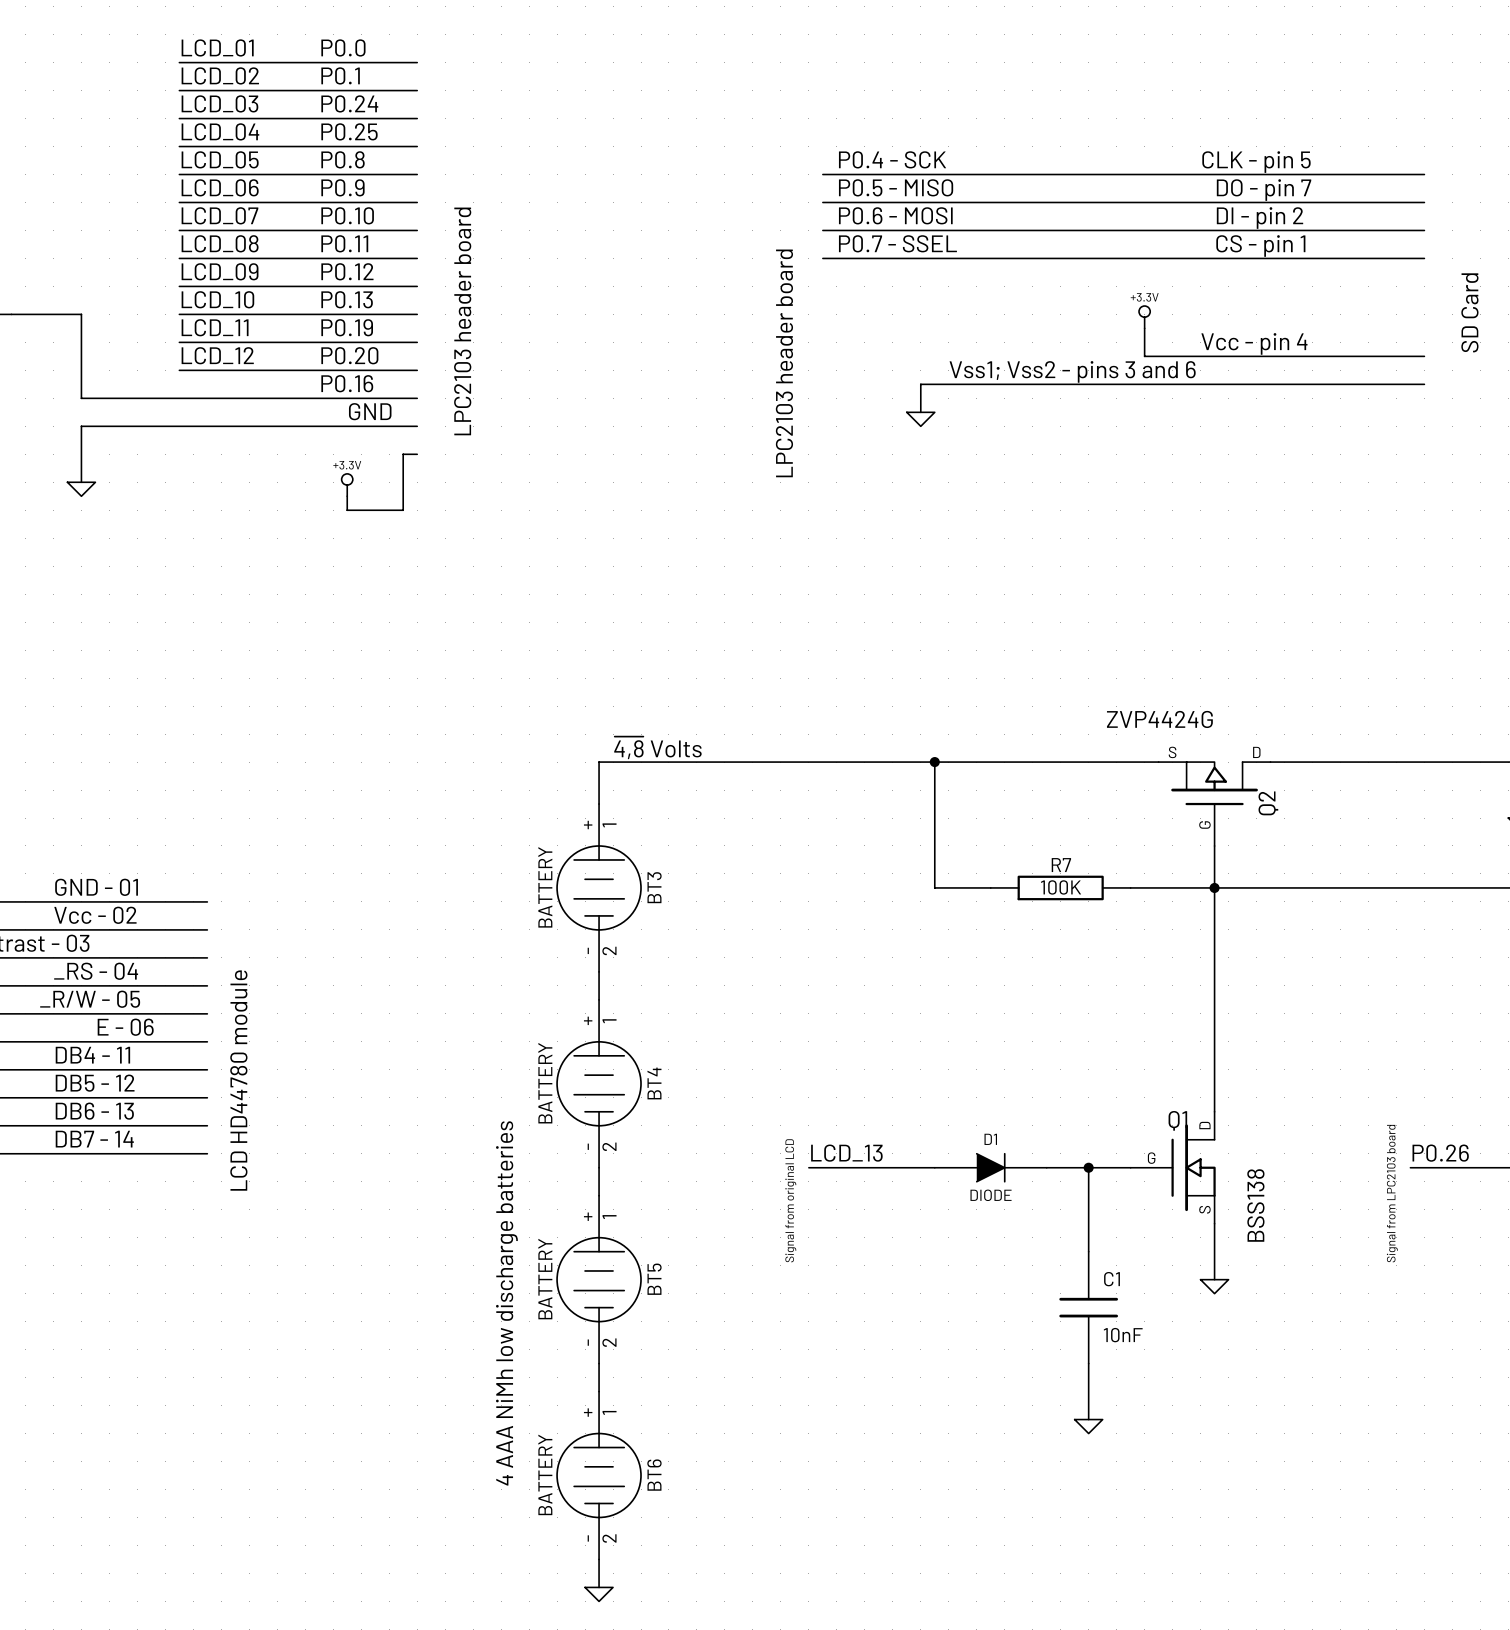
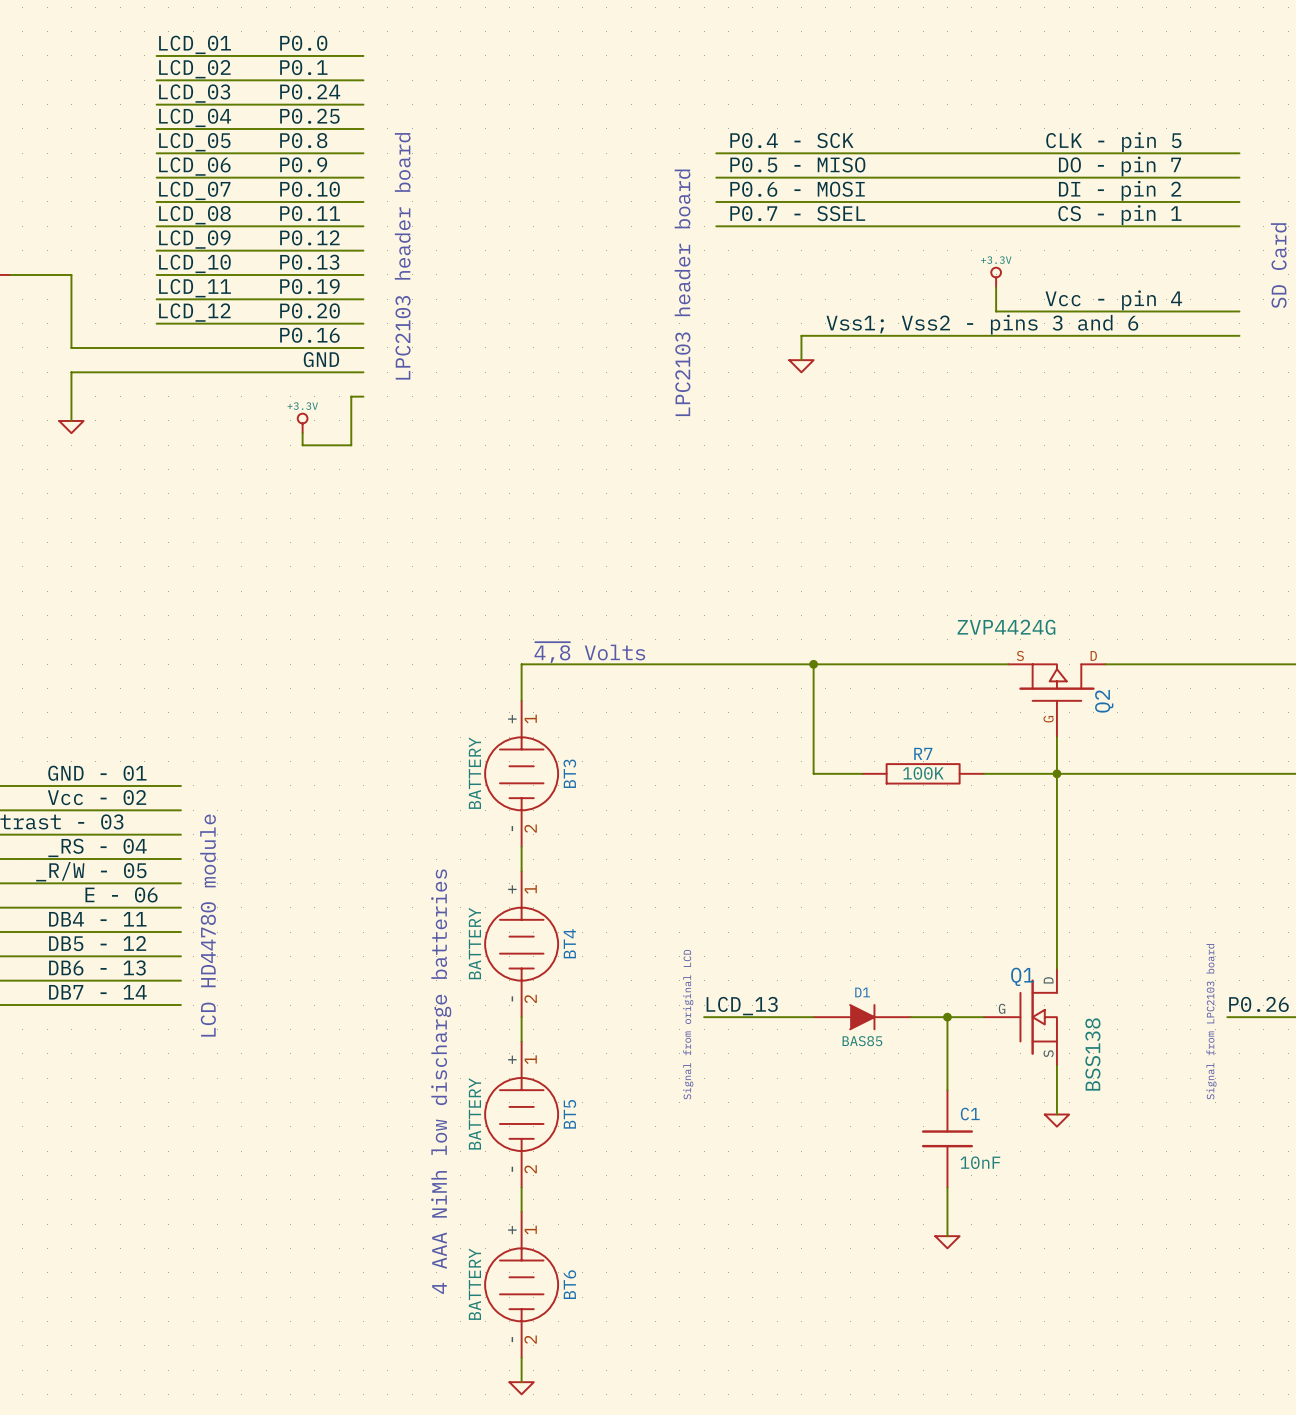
D1 value: DIODE (991, 1195) -> BAS85 (862, 1041)

